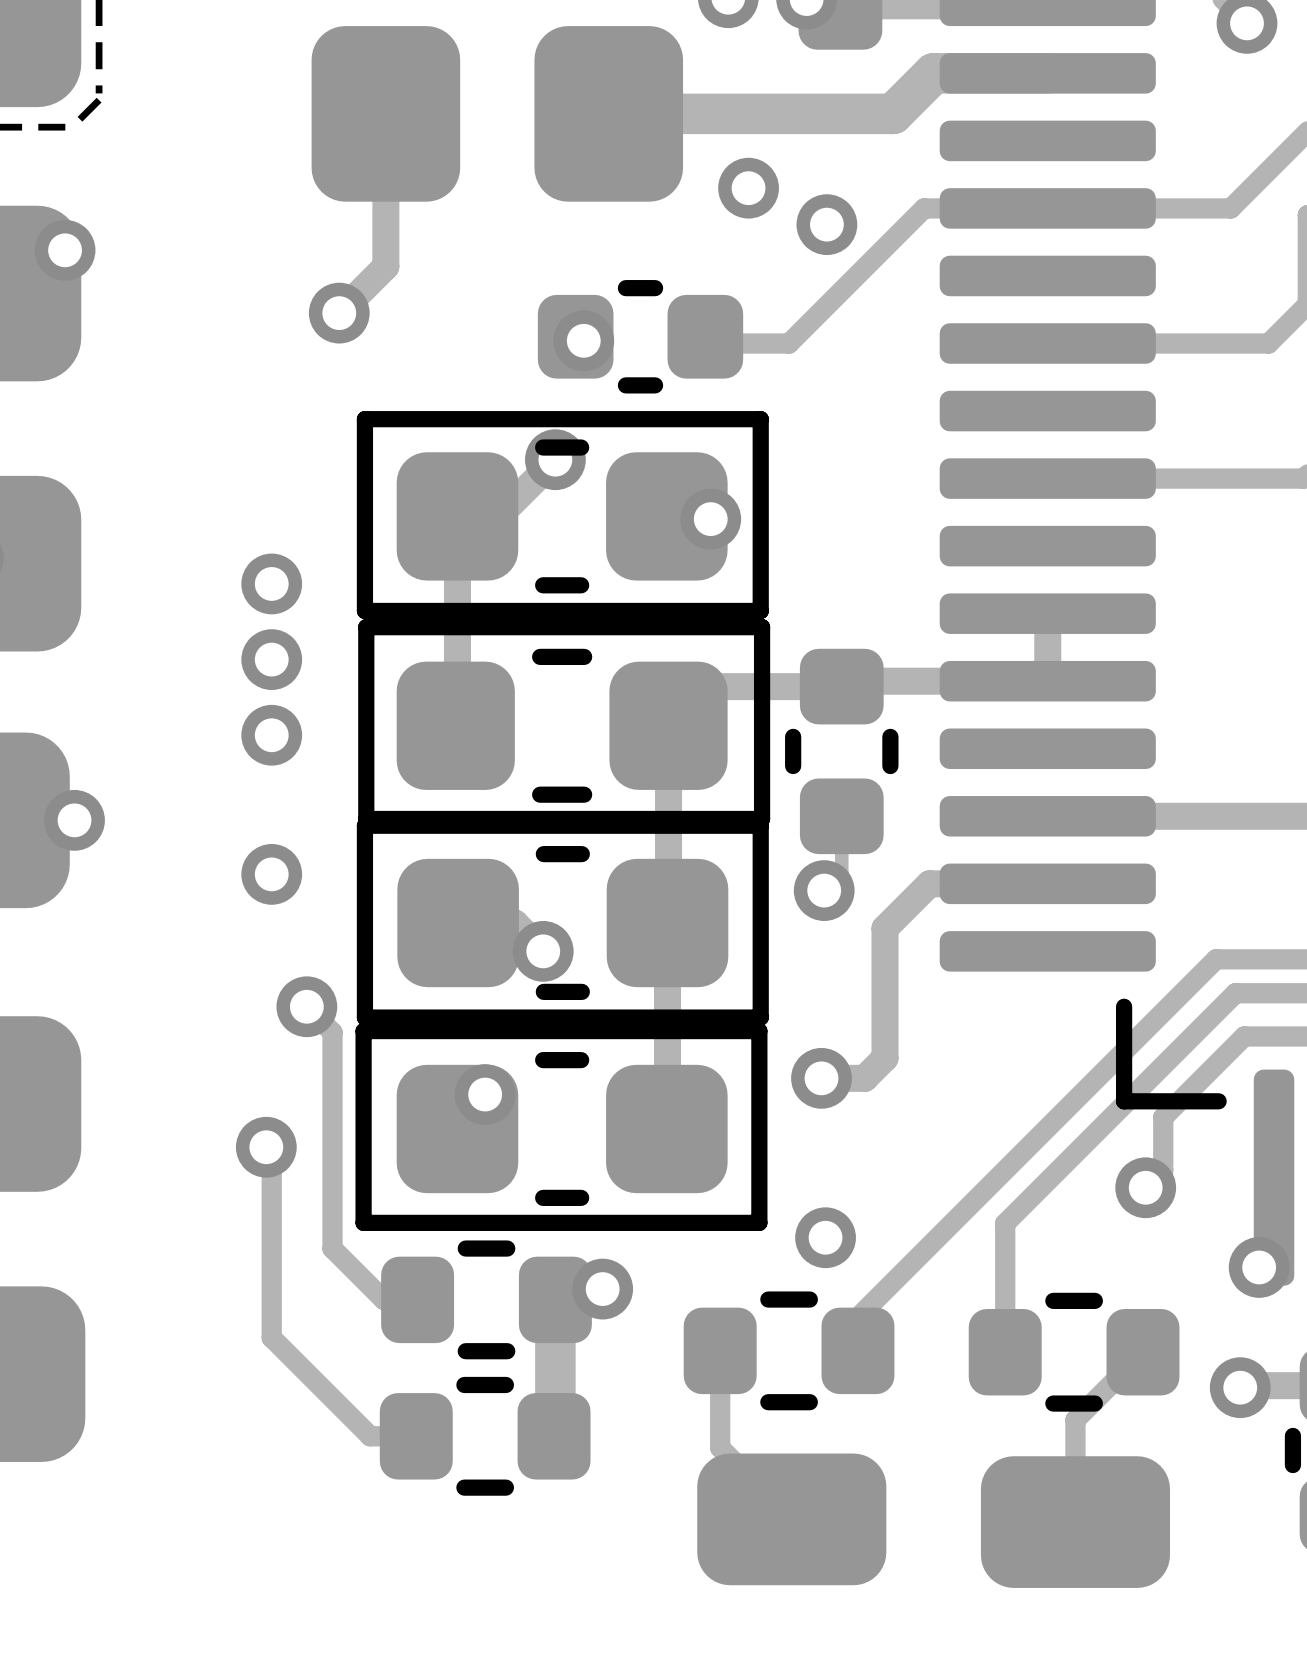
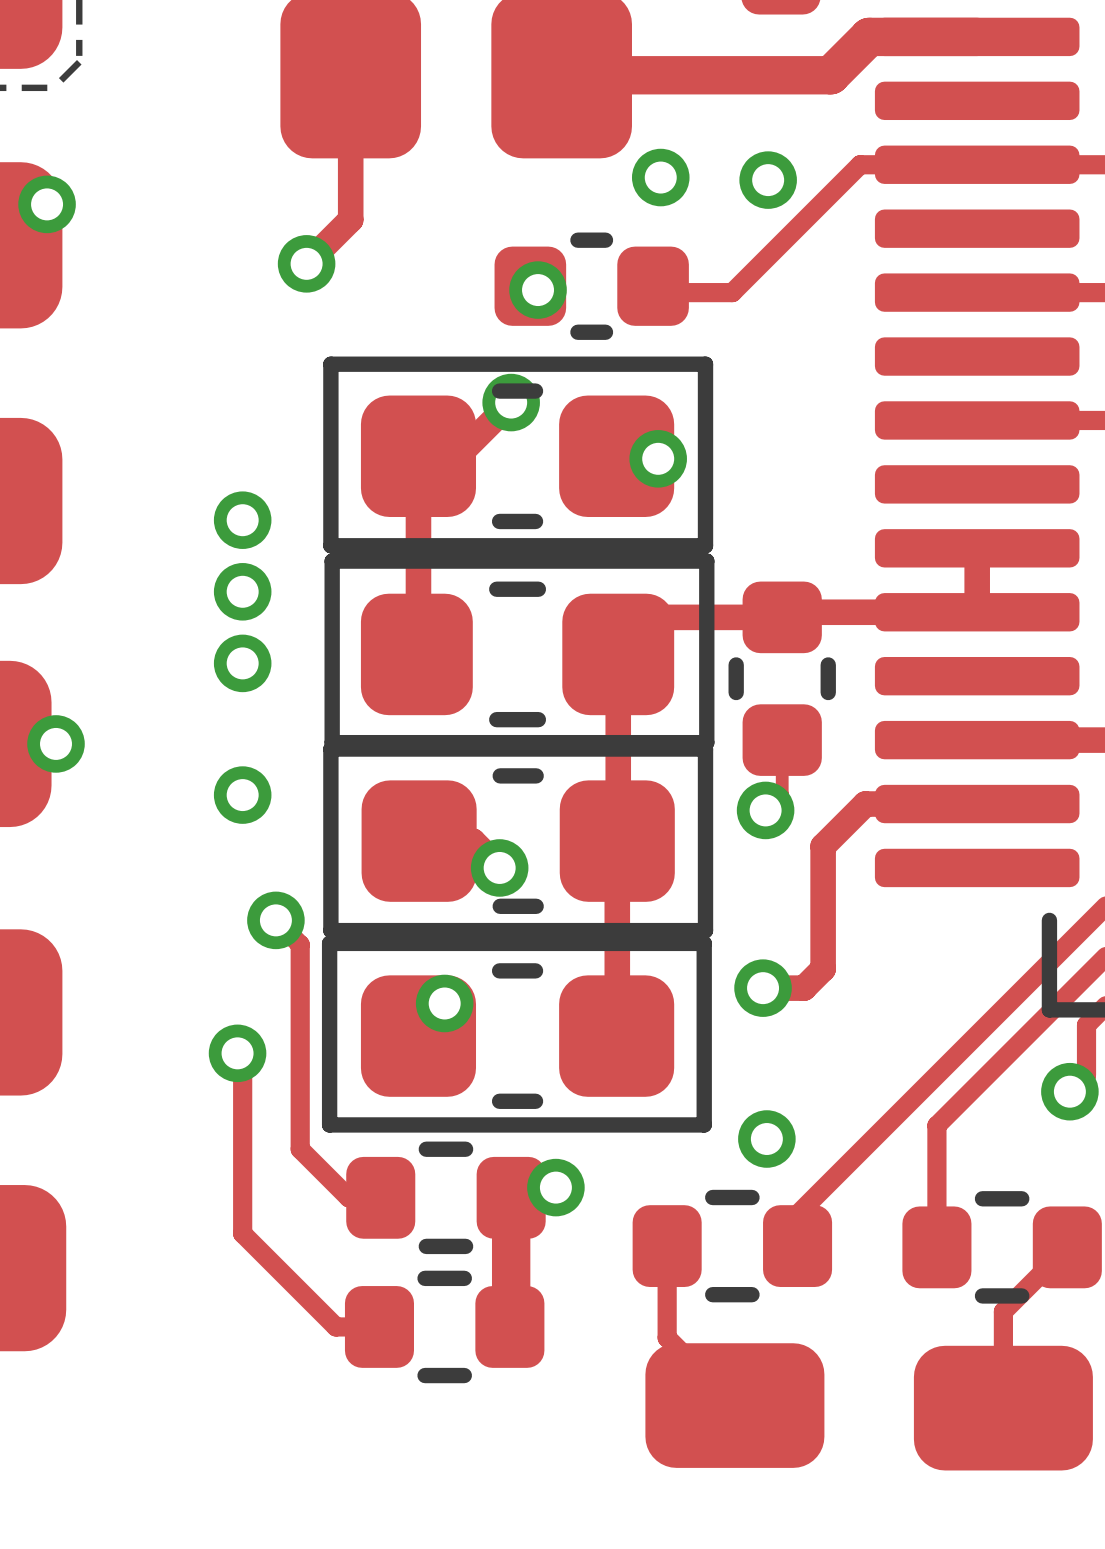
via position: (748, 188) -> (660, 177)

